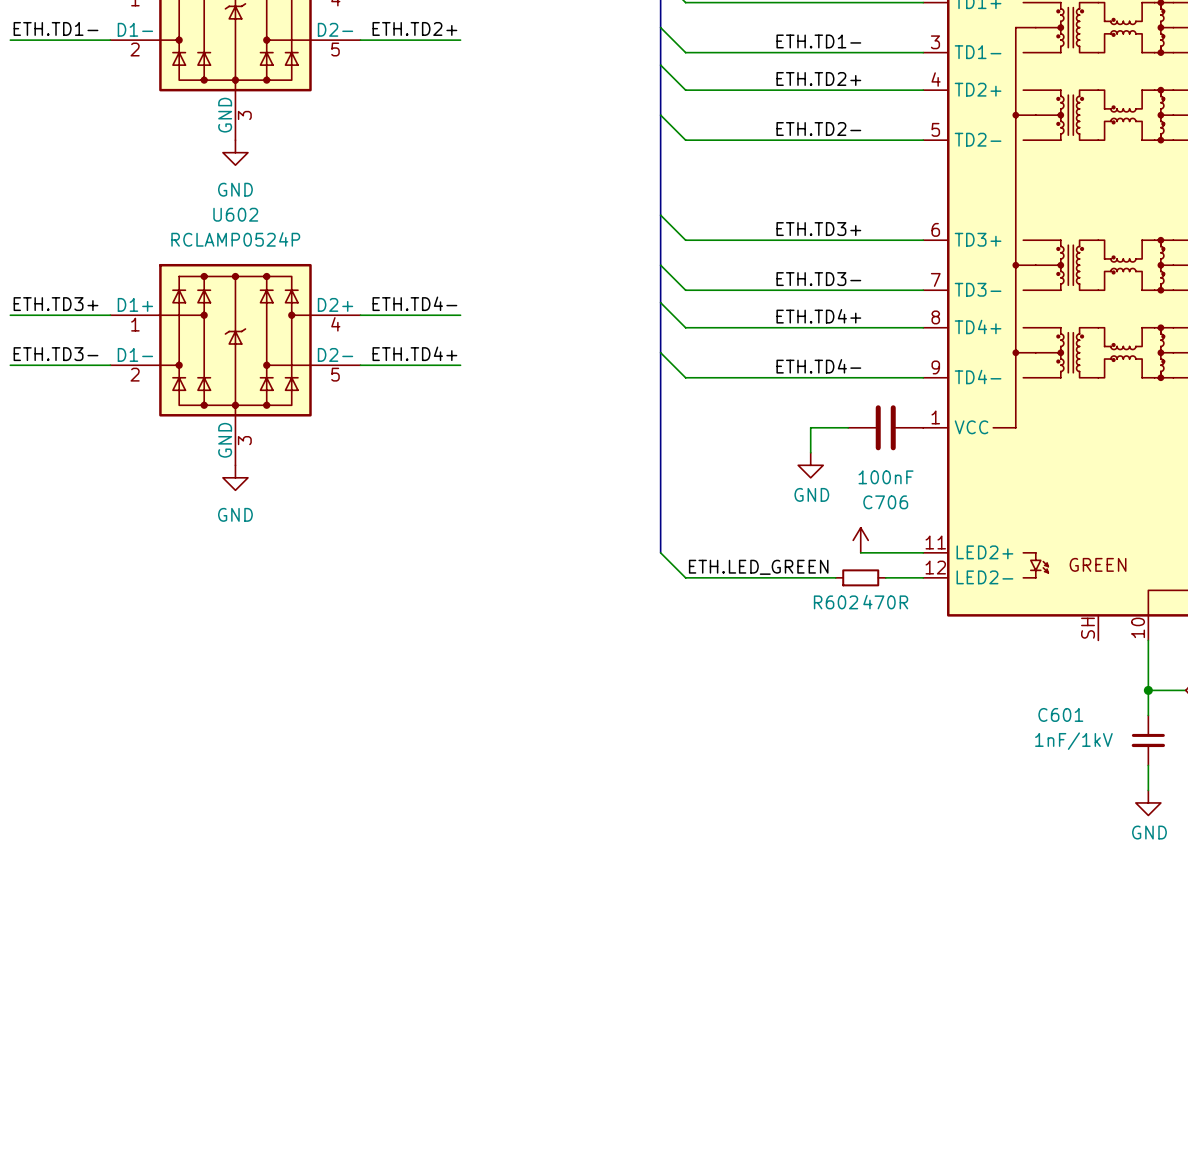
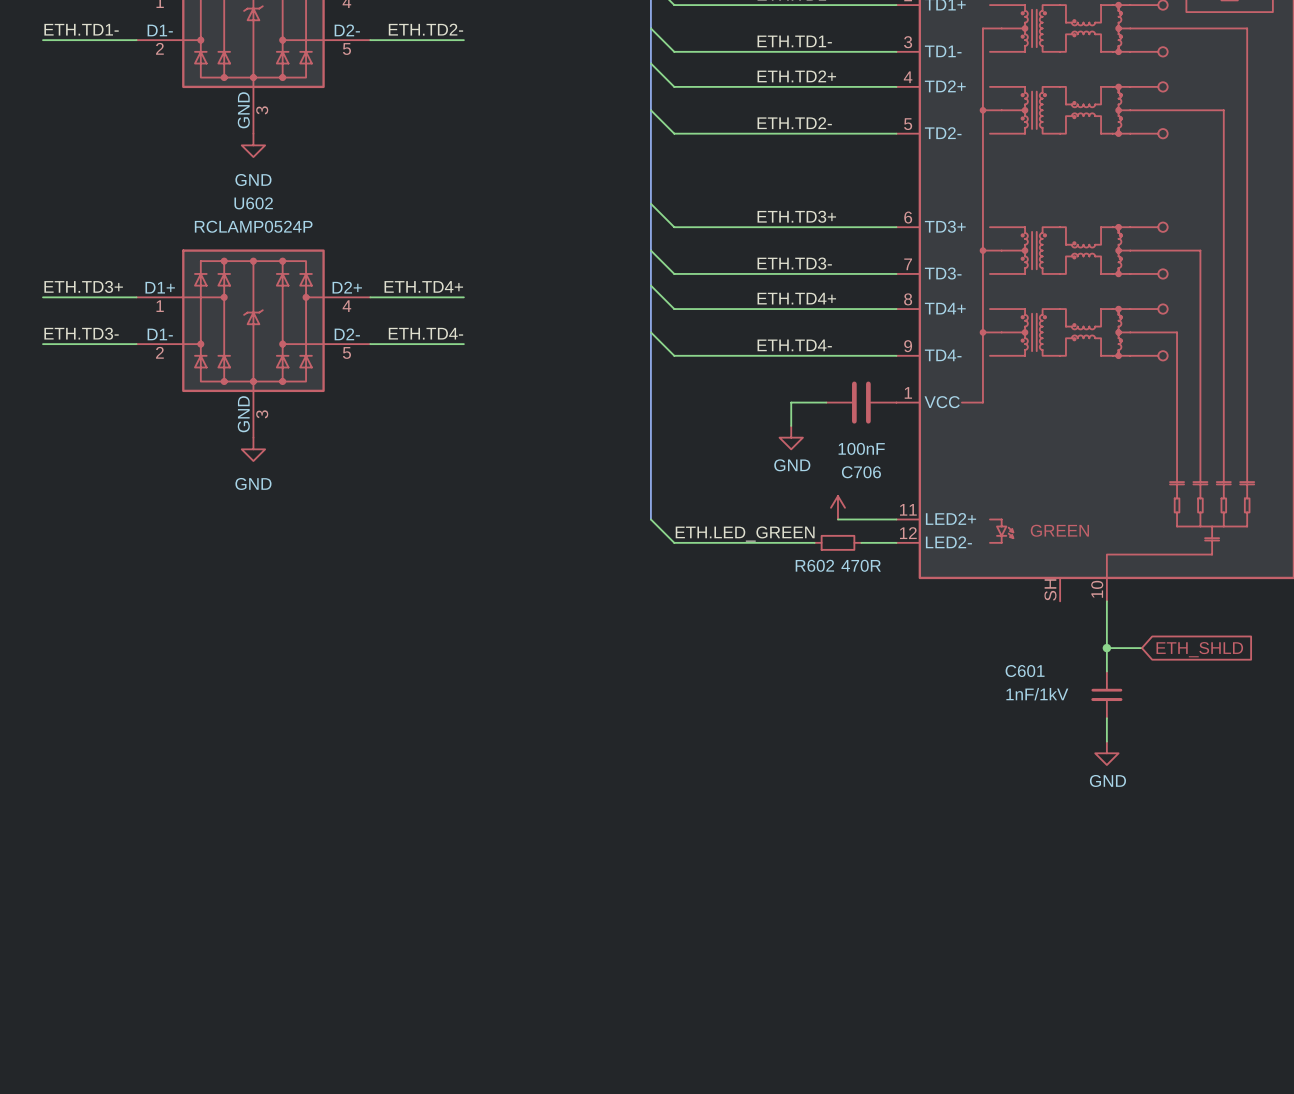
label: ETH.TD2+ (414, 28) -> ETH.TD2- (425, 29)
label: ETH.TD4- (414, 303) -> ETH.TD4+ (423, 286)
label: ETH.TD4+ (414, 353) -> ETH.TD4- (425, 333)

